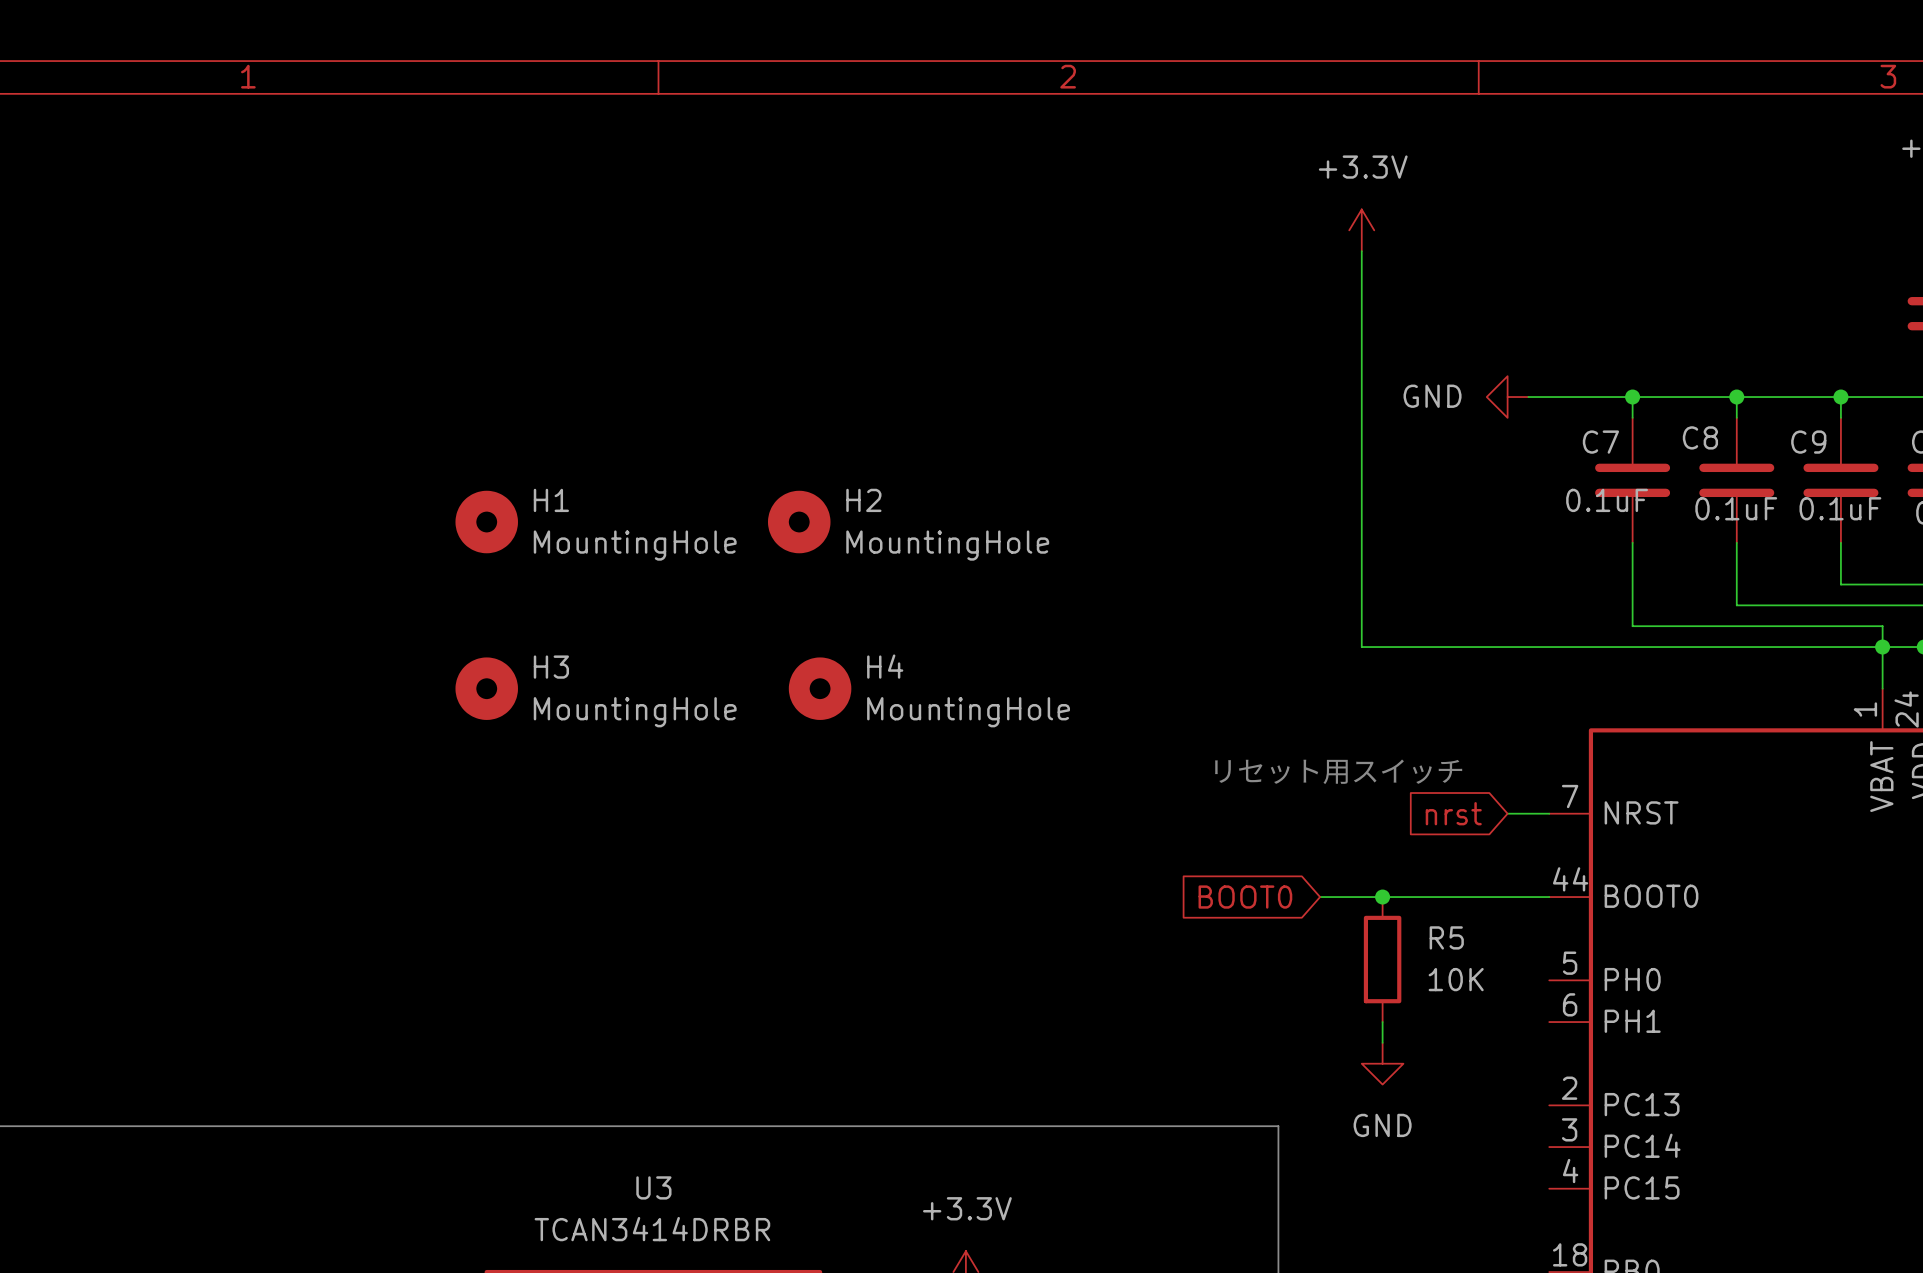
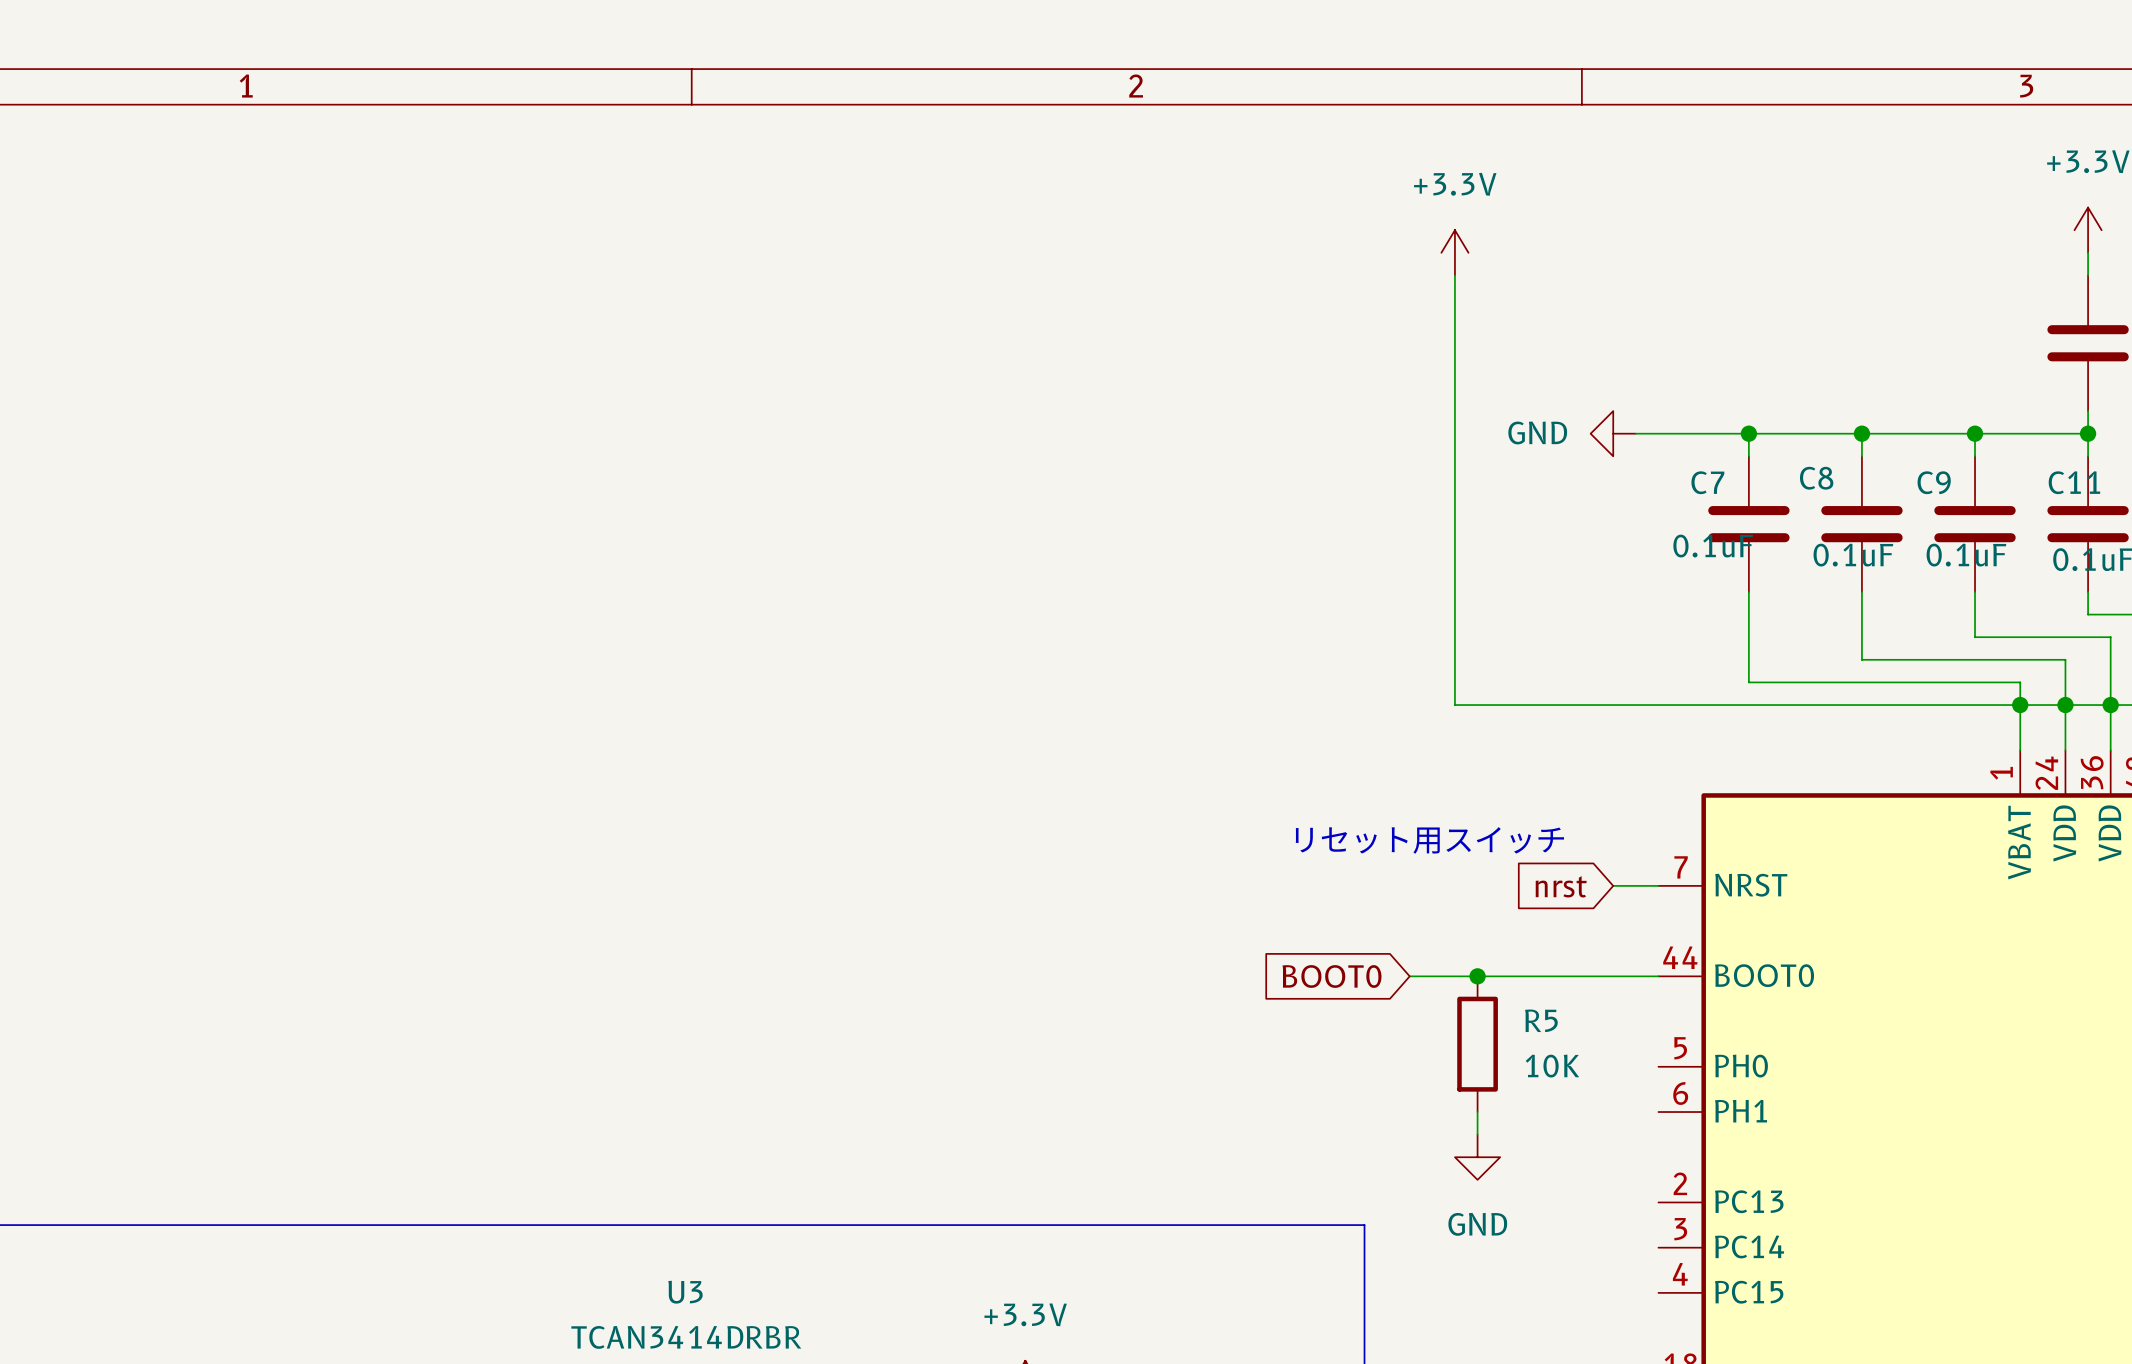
H1: MountingHole (486, 522) -> none
H2: MountingHole (799, 522) -> none
H3: MountingHole (486, 688) -> none
H4: MountingHole (820, 688) -> none

